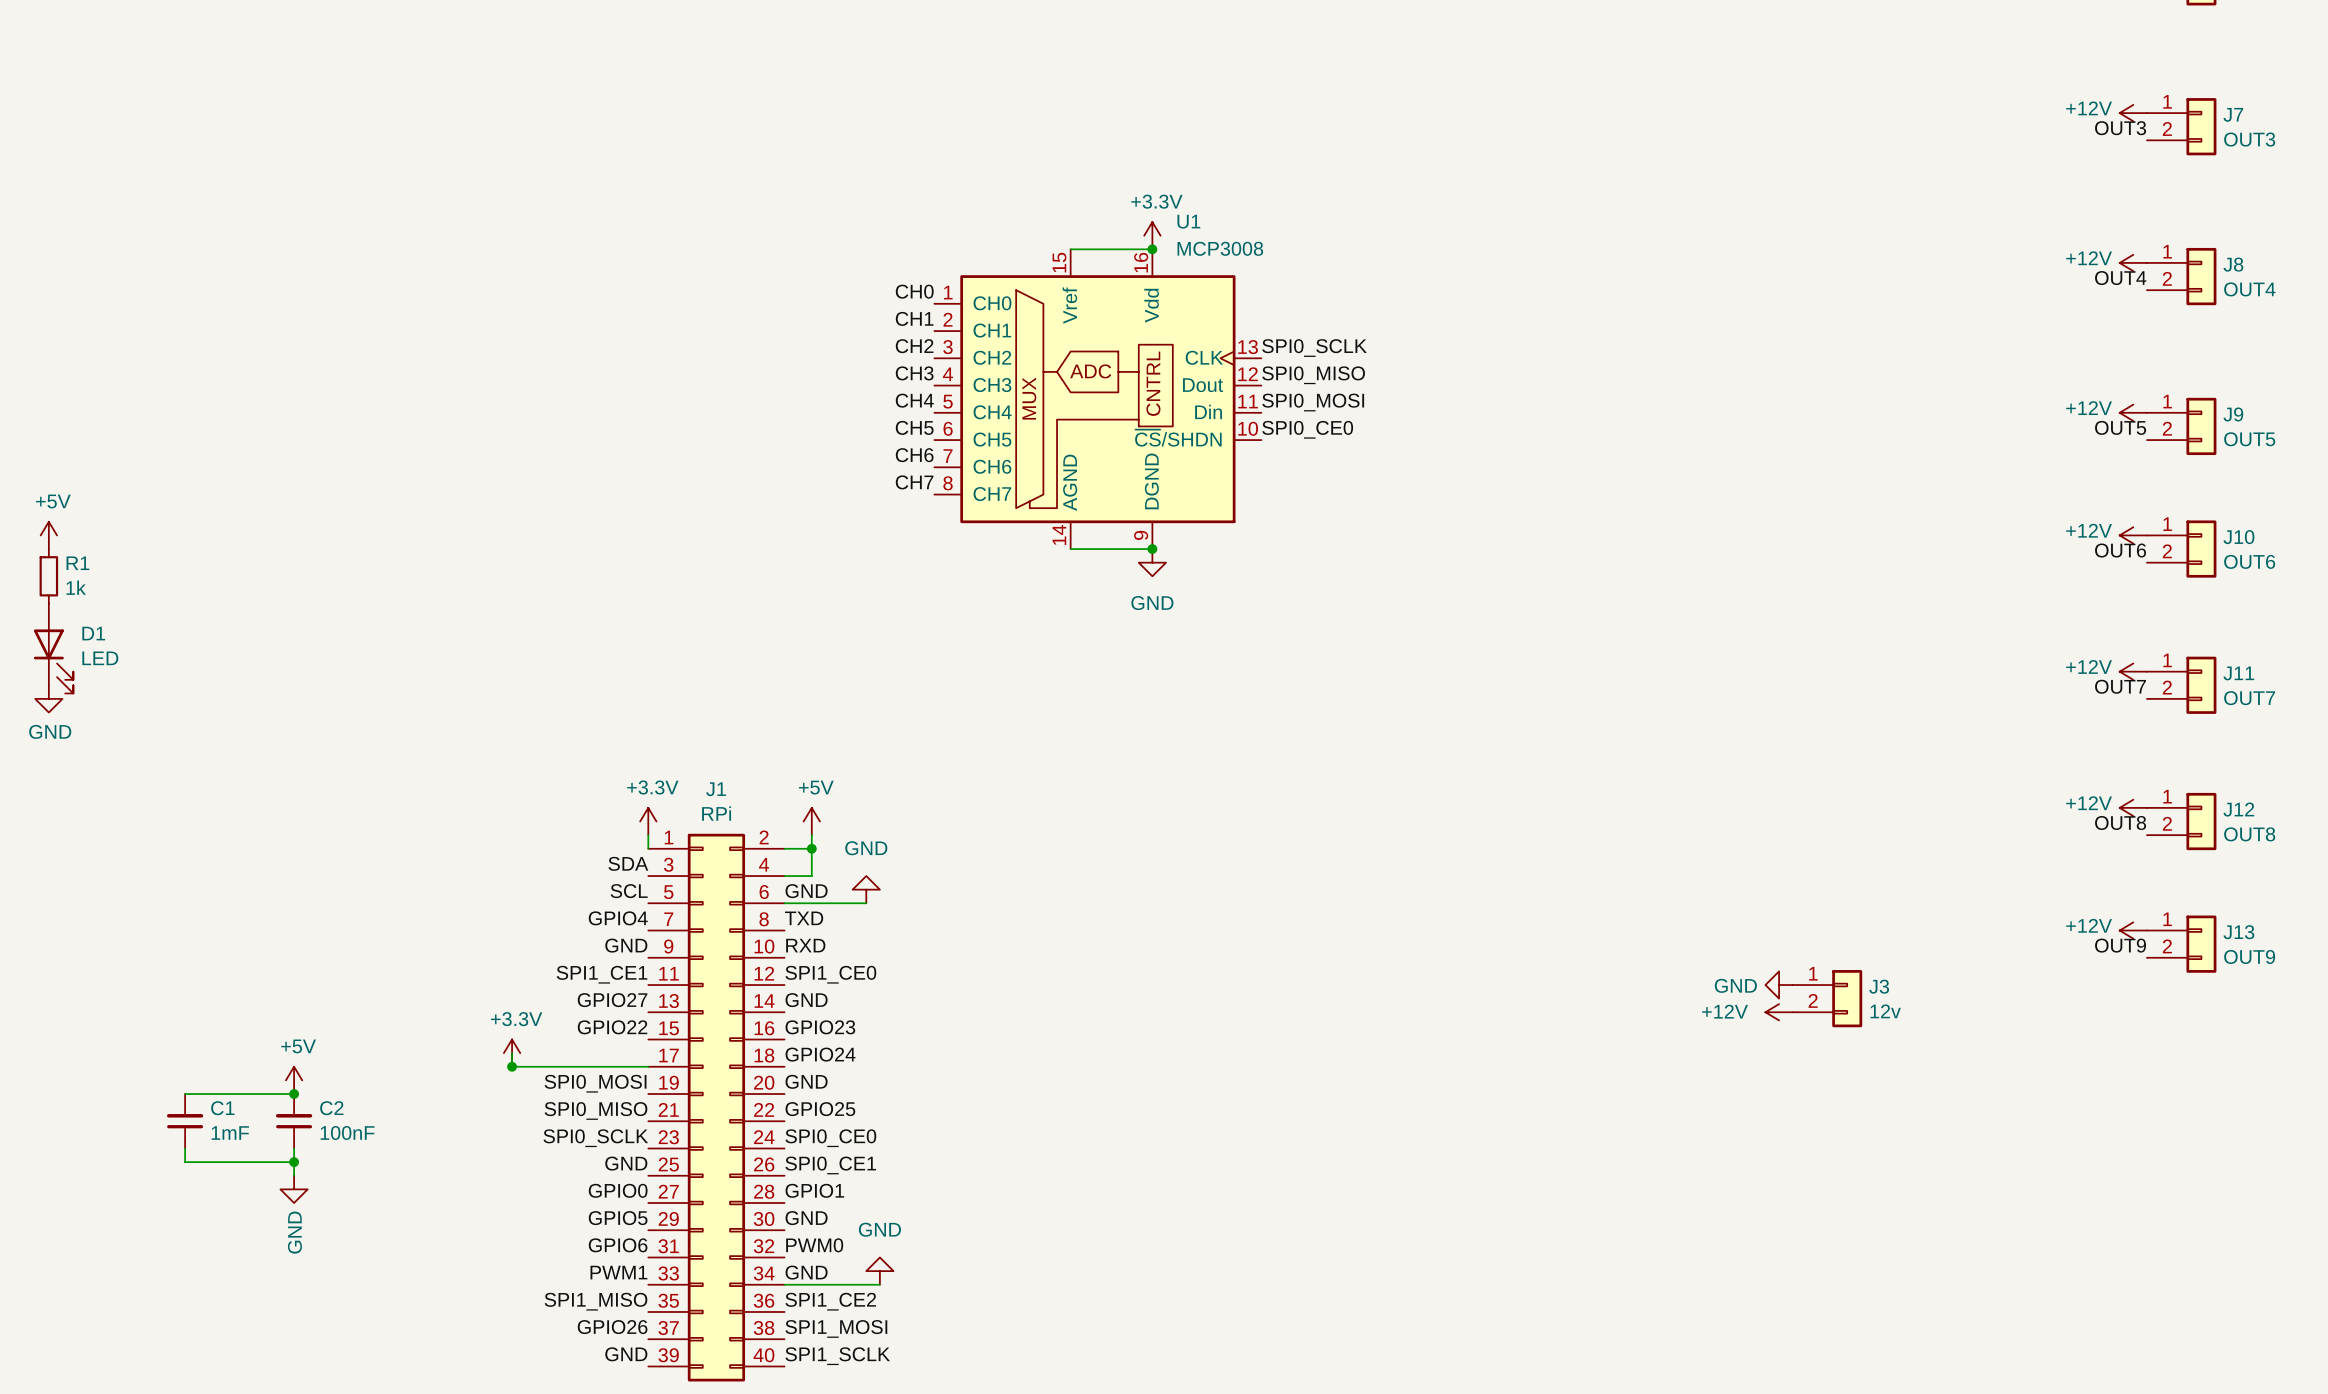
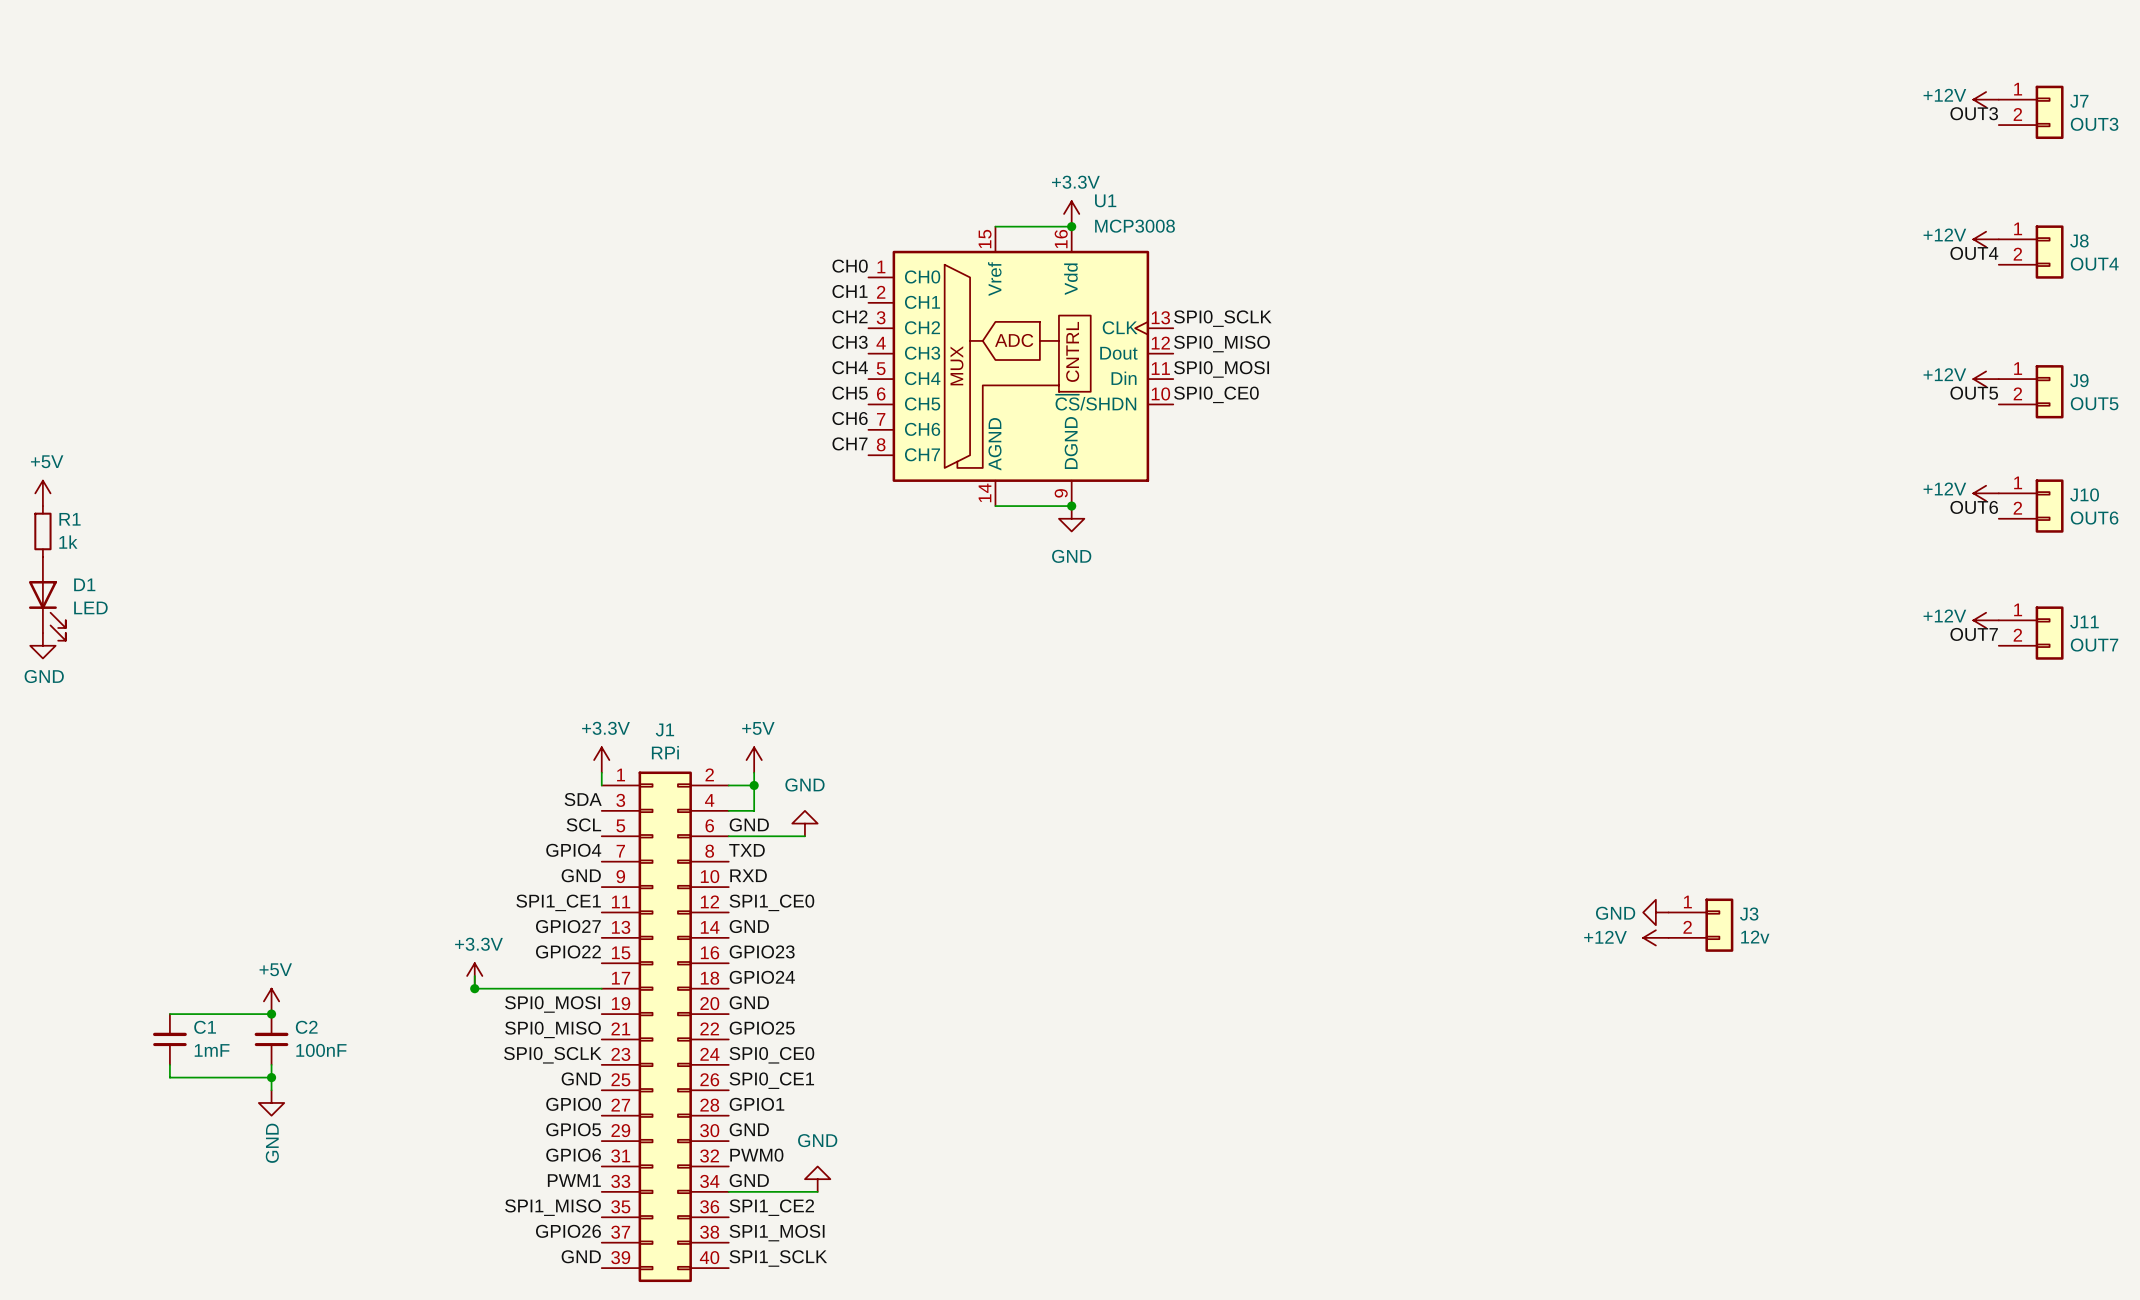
power symbol: +12V (2133, 807) -> none
J12: OUT8 (2181, 821) -> none
label: OUT8 (2120, 822) -> none
power symbol: +12V (2133, 930) -> none
J13: OUT9 (2181, 944) -> none
label: OUT9 (2120, 945) -> none

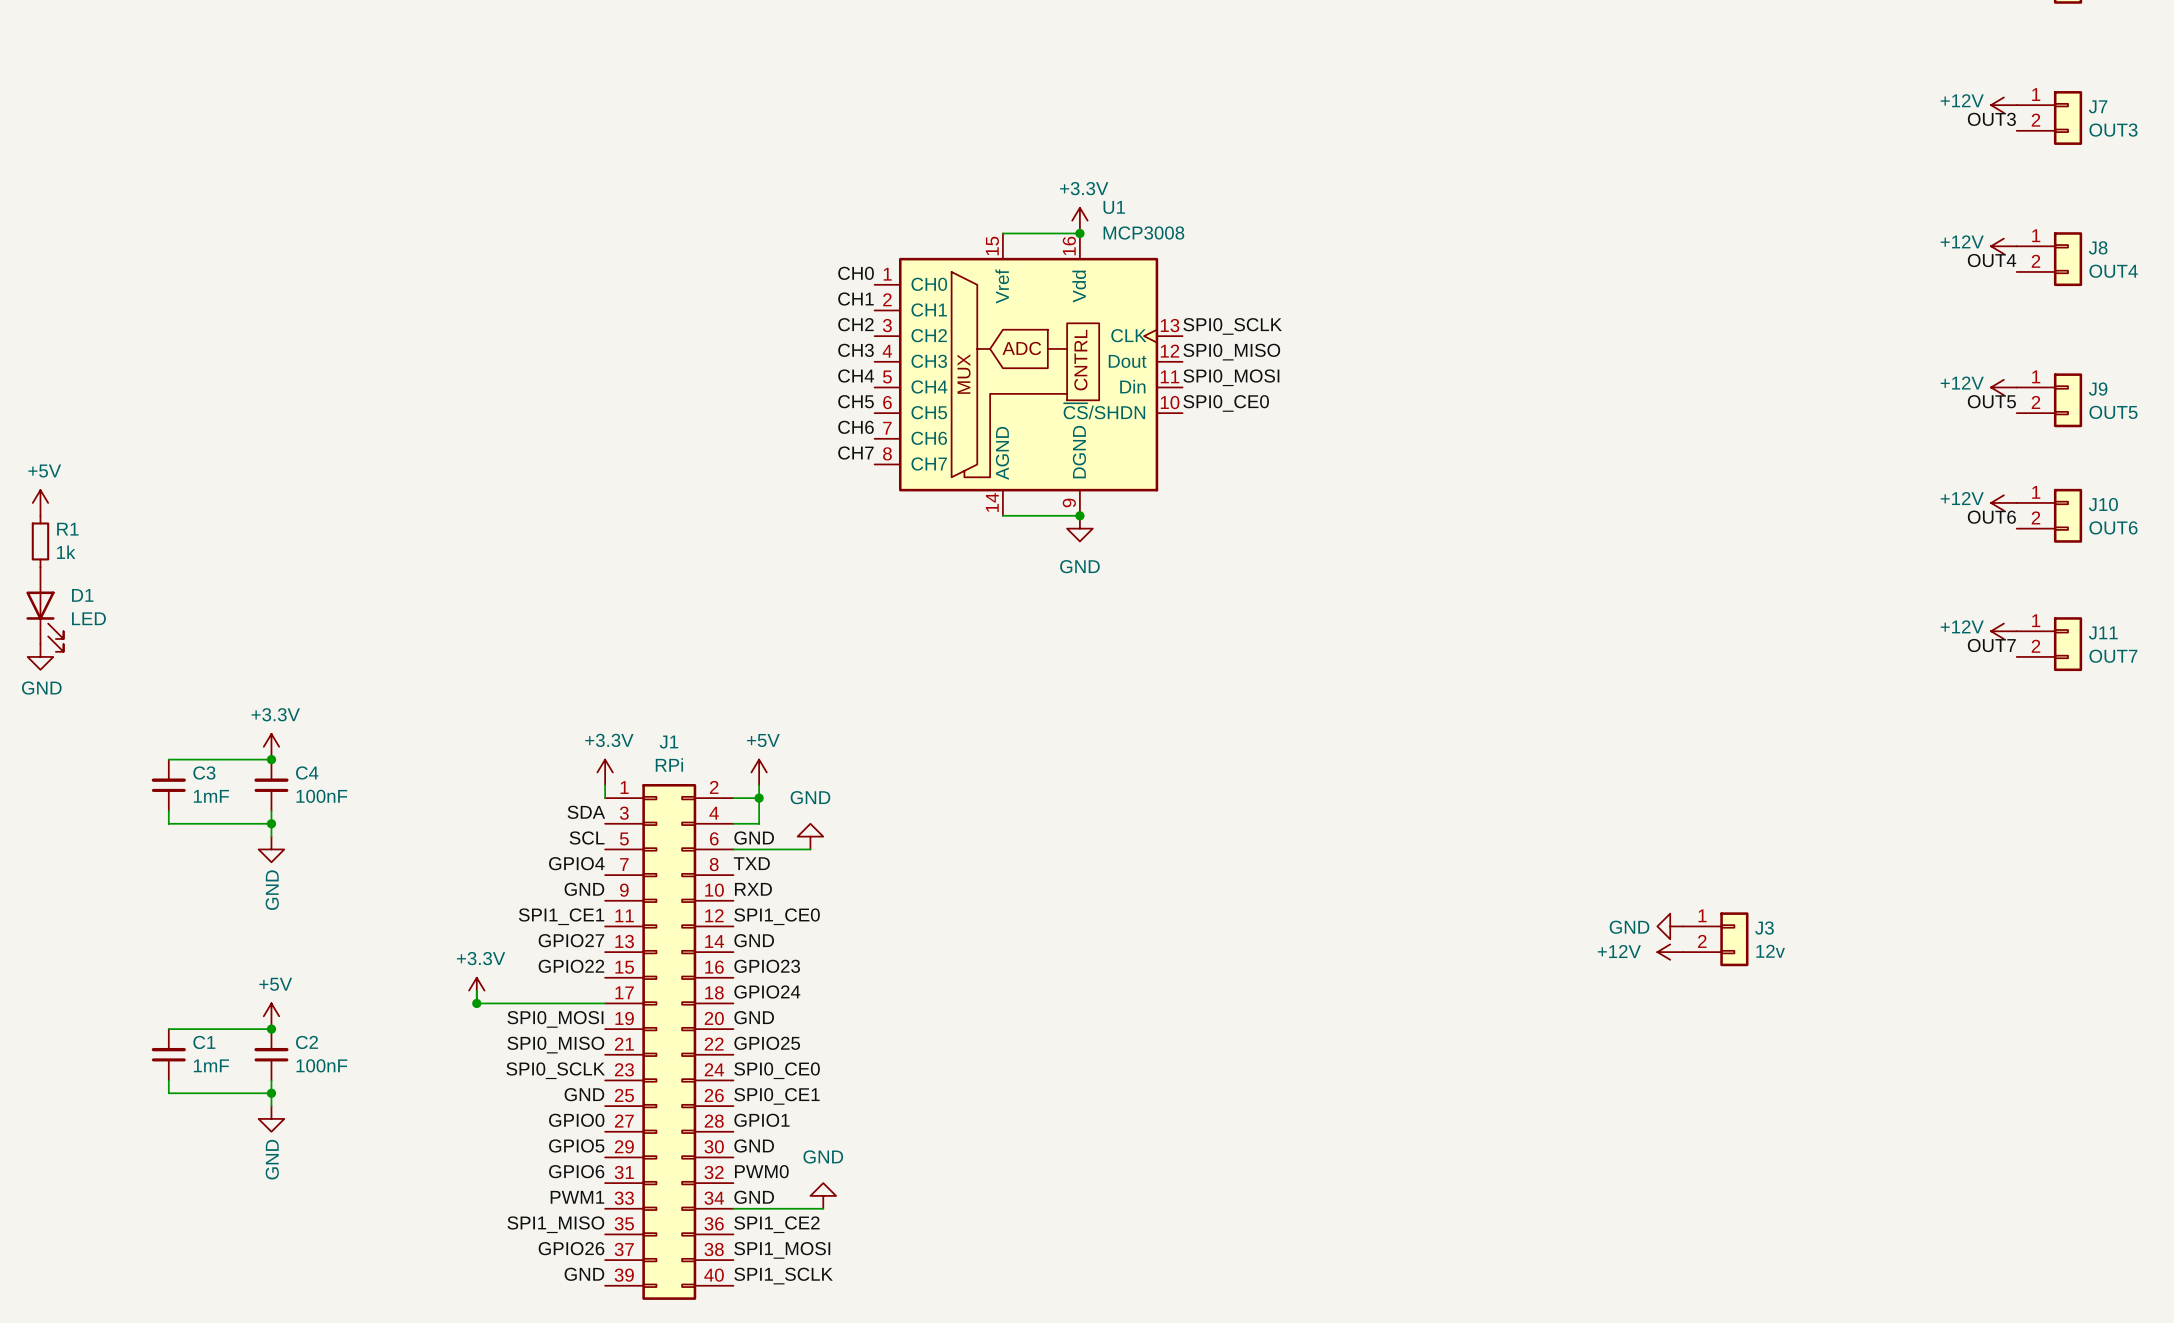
power symbol: none -> +3.3V (271, 746)
wire: none -> (168, 759) (271, 759)
junction: none -> (271, 759)
C3: none -> 1mF (168, 785)
C4: none -> 100nF (271, 785)
wire: none -> (168, 810) (168, 823) (271, 823)
wire: none -> (271, 810) (271, 836)
junction: none -> (271, 823)
power symbol: none -> GND (271, 849)

